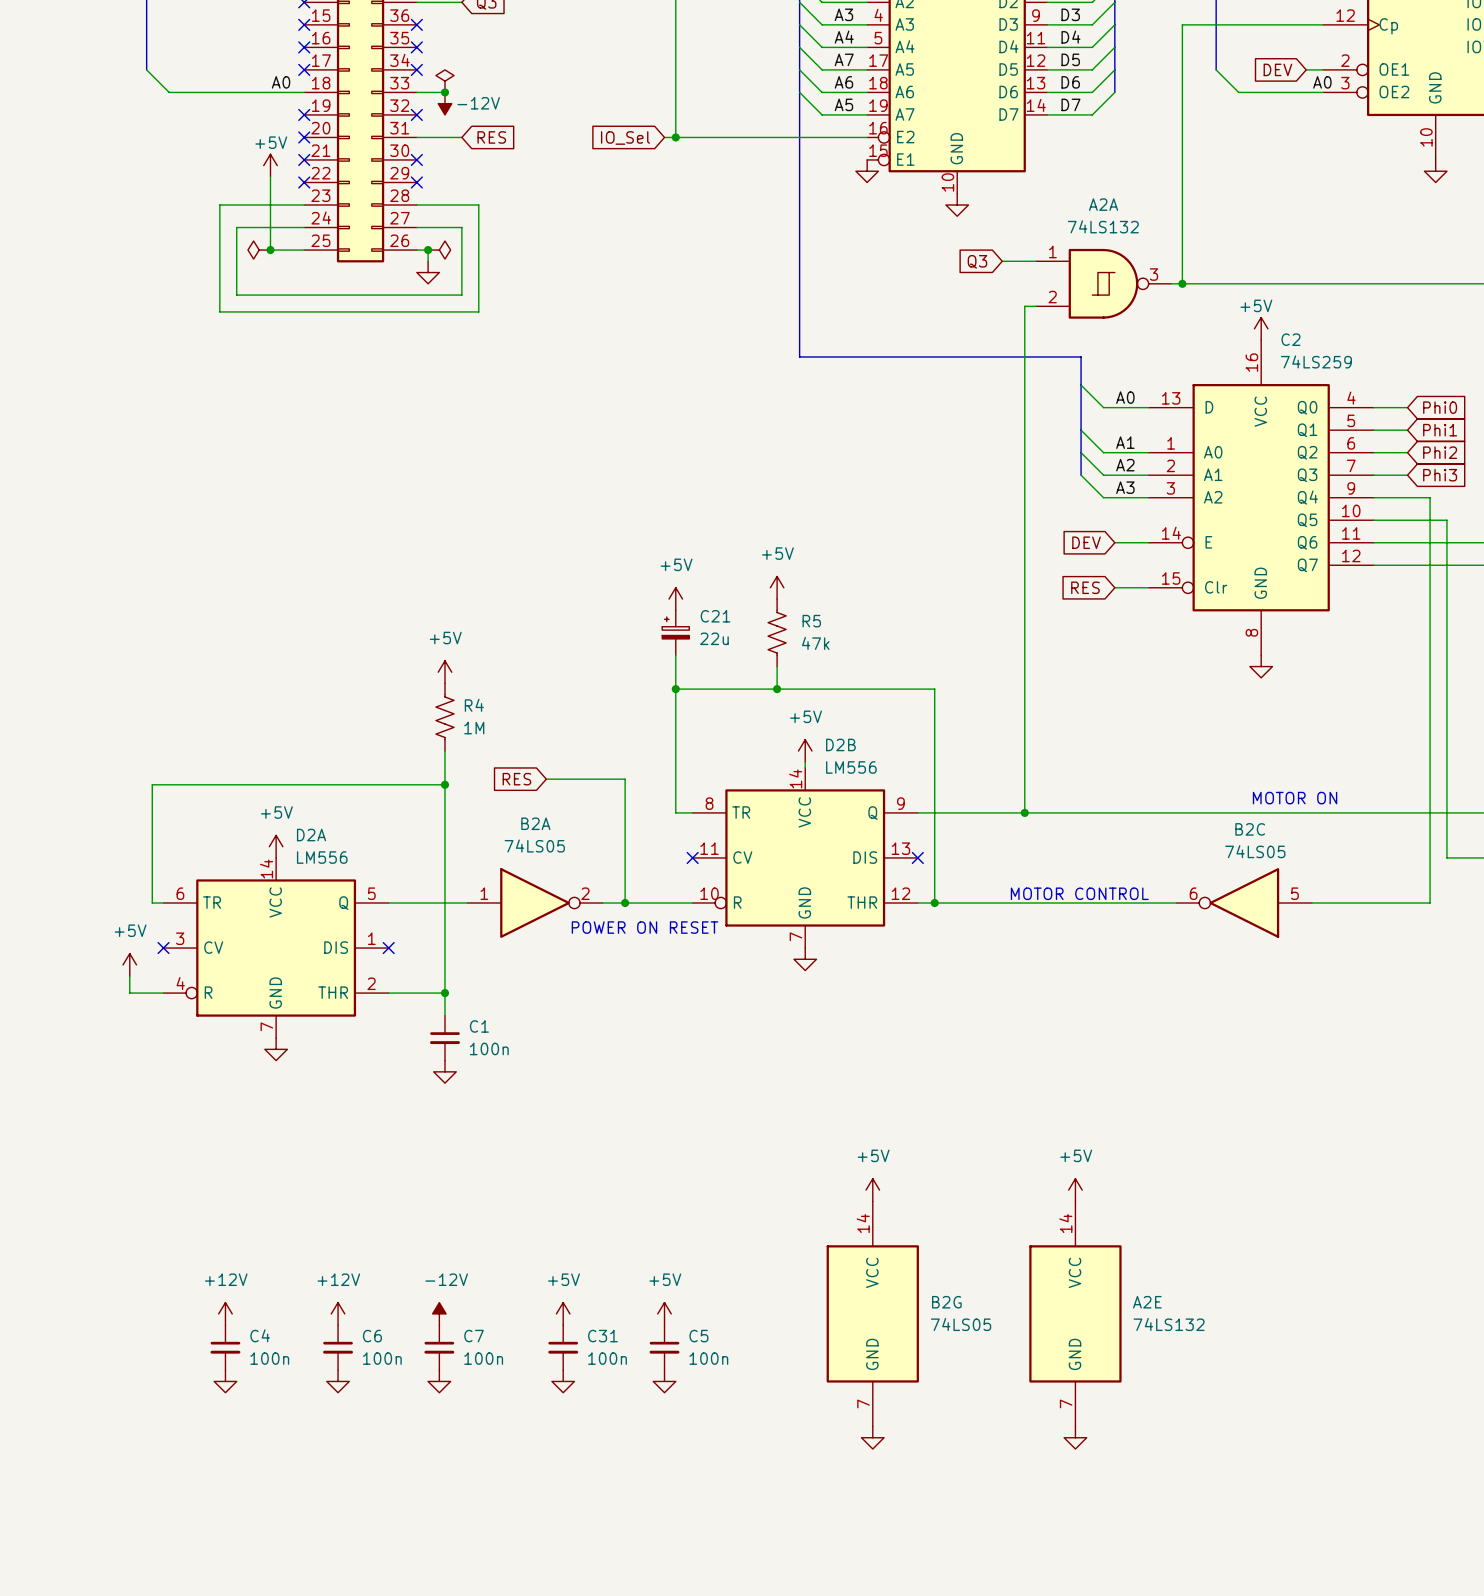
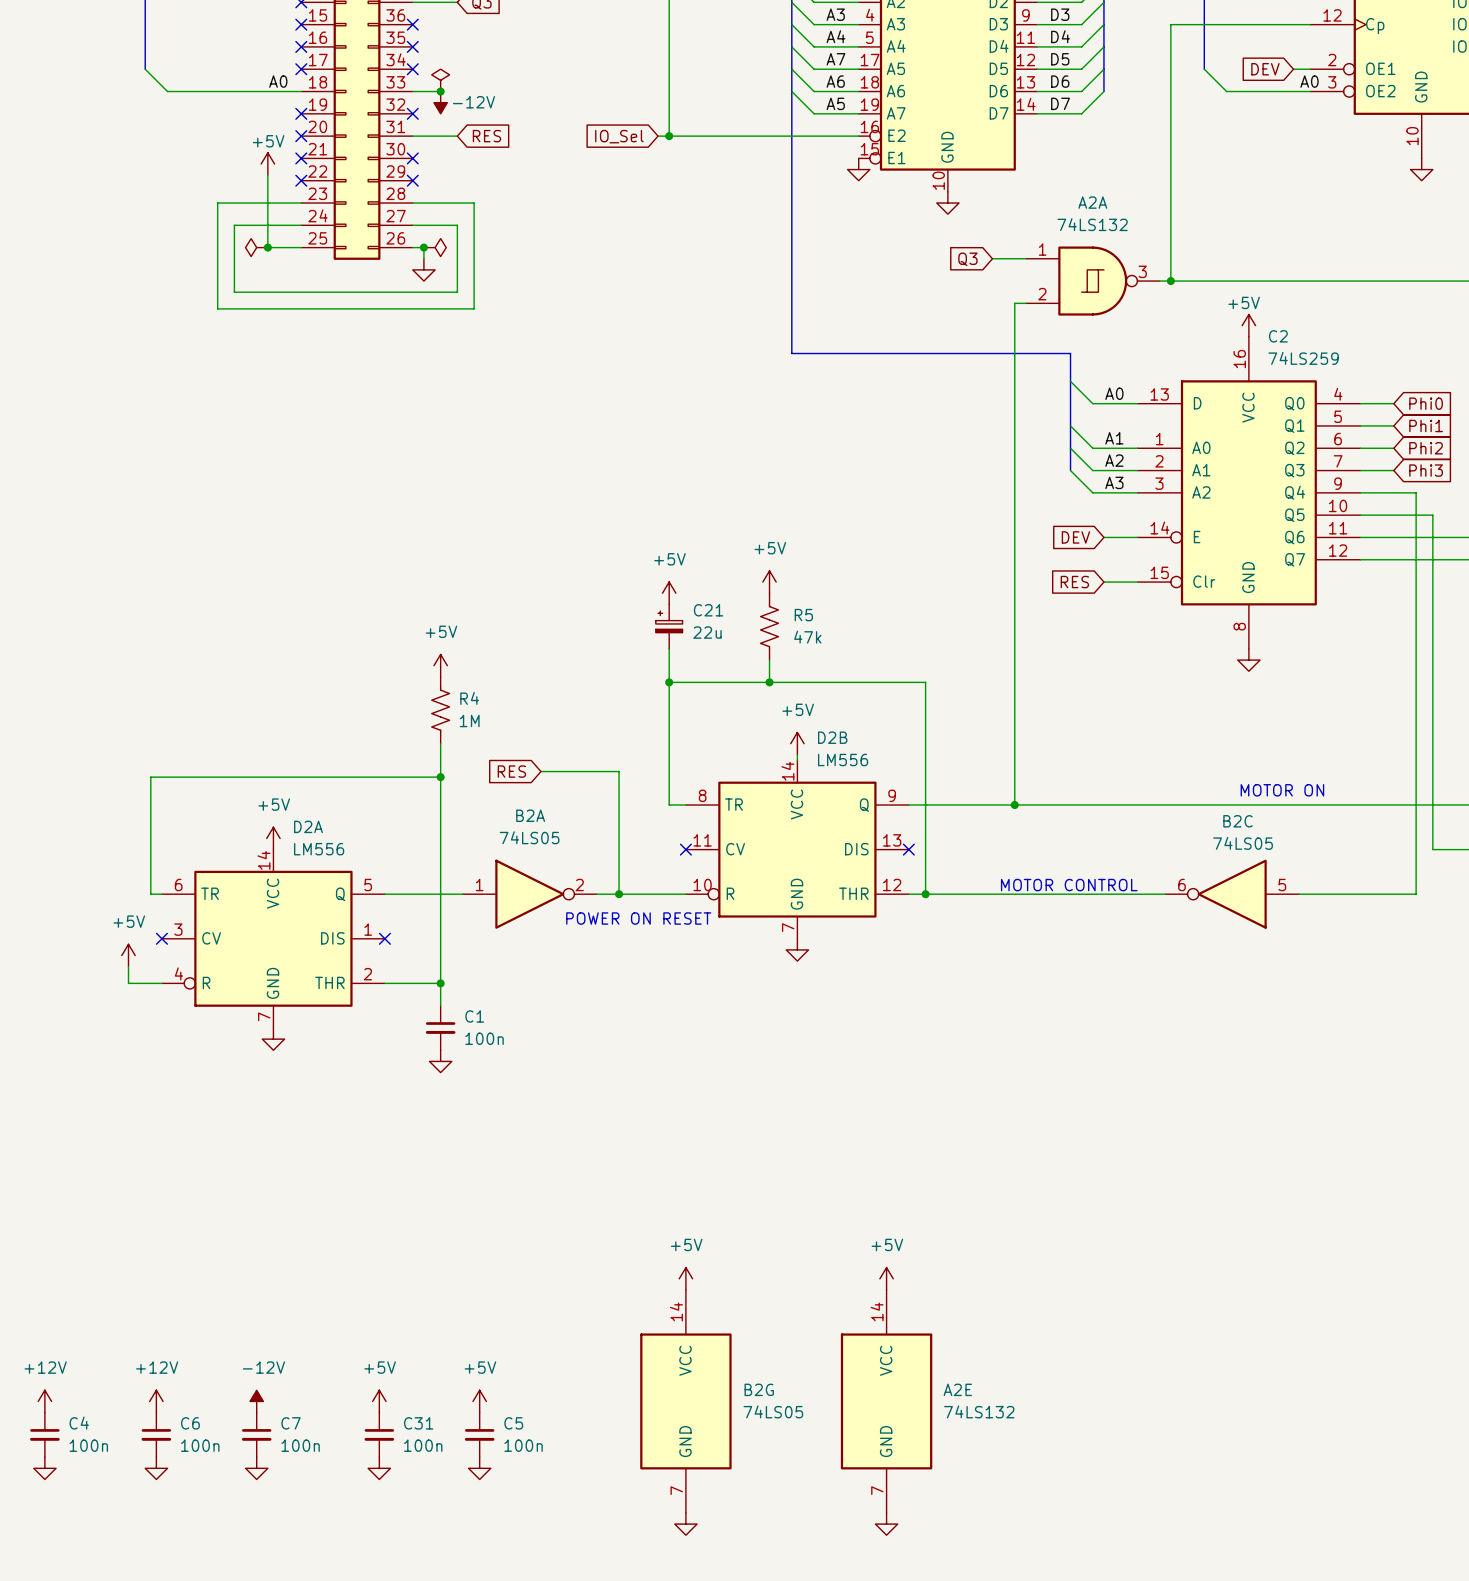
power symbol: +5V (872, 1190) -> none
power symbol: +5V (1075, 1190) -> none
power symbol: none -> +5V (886, 1278)
power symbol: +12V (225, 1313) -> none
power symbol: +12V (338, 1313) -> none
power symbol position: -12V (439, 1313) -> -12V (256, 1401)
power symbol: +5V (563, 1313) -> none
power symbol position: +5V (664, 1313) -> +5V (685, 1278)
B2G position: (872, 1313) -> (685, 1401)
A2E position: (1075, 1313) -> (886, 1401)
C4 position: (225, 1347) -> (44, 1434)
C6 position: (338, 1347) -> (156, 1434)
C7 position: (439, 1347) -> (256, 1434)
C31 position: (563, 1347) -> (379, 1434)
C5 position: (664, 1347) -> (479, 1434)
power symbol: (225, 1381) -> none
power symbol: (338, 1381) -> none
power symbol: (439, 1381) -> none
power symbol: (563, 1381) -> none
power symbol: (664, 1381) -> none
power symbol: none -> +12V (44, 1401)
power symbol: none -> +12V (156, 1401)
power symbol: none -> +5V (379, 1401)
power symbol: none -> +5V (479, 1401)
power symbol: (872, 1437) -> none
power symbol: (1075, 1437) -> none
power symbol: none -> (44, 1468)
power symbol: none -> (156, 1468)
power symbol: none -> (256, 1468)
power symbol: none -> (379, 1468)
power symbol: none -> (479, 1468)
power symbol: none -> (685, 1524)
power symbol: none -> (886, 1524)

